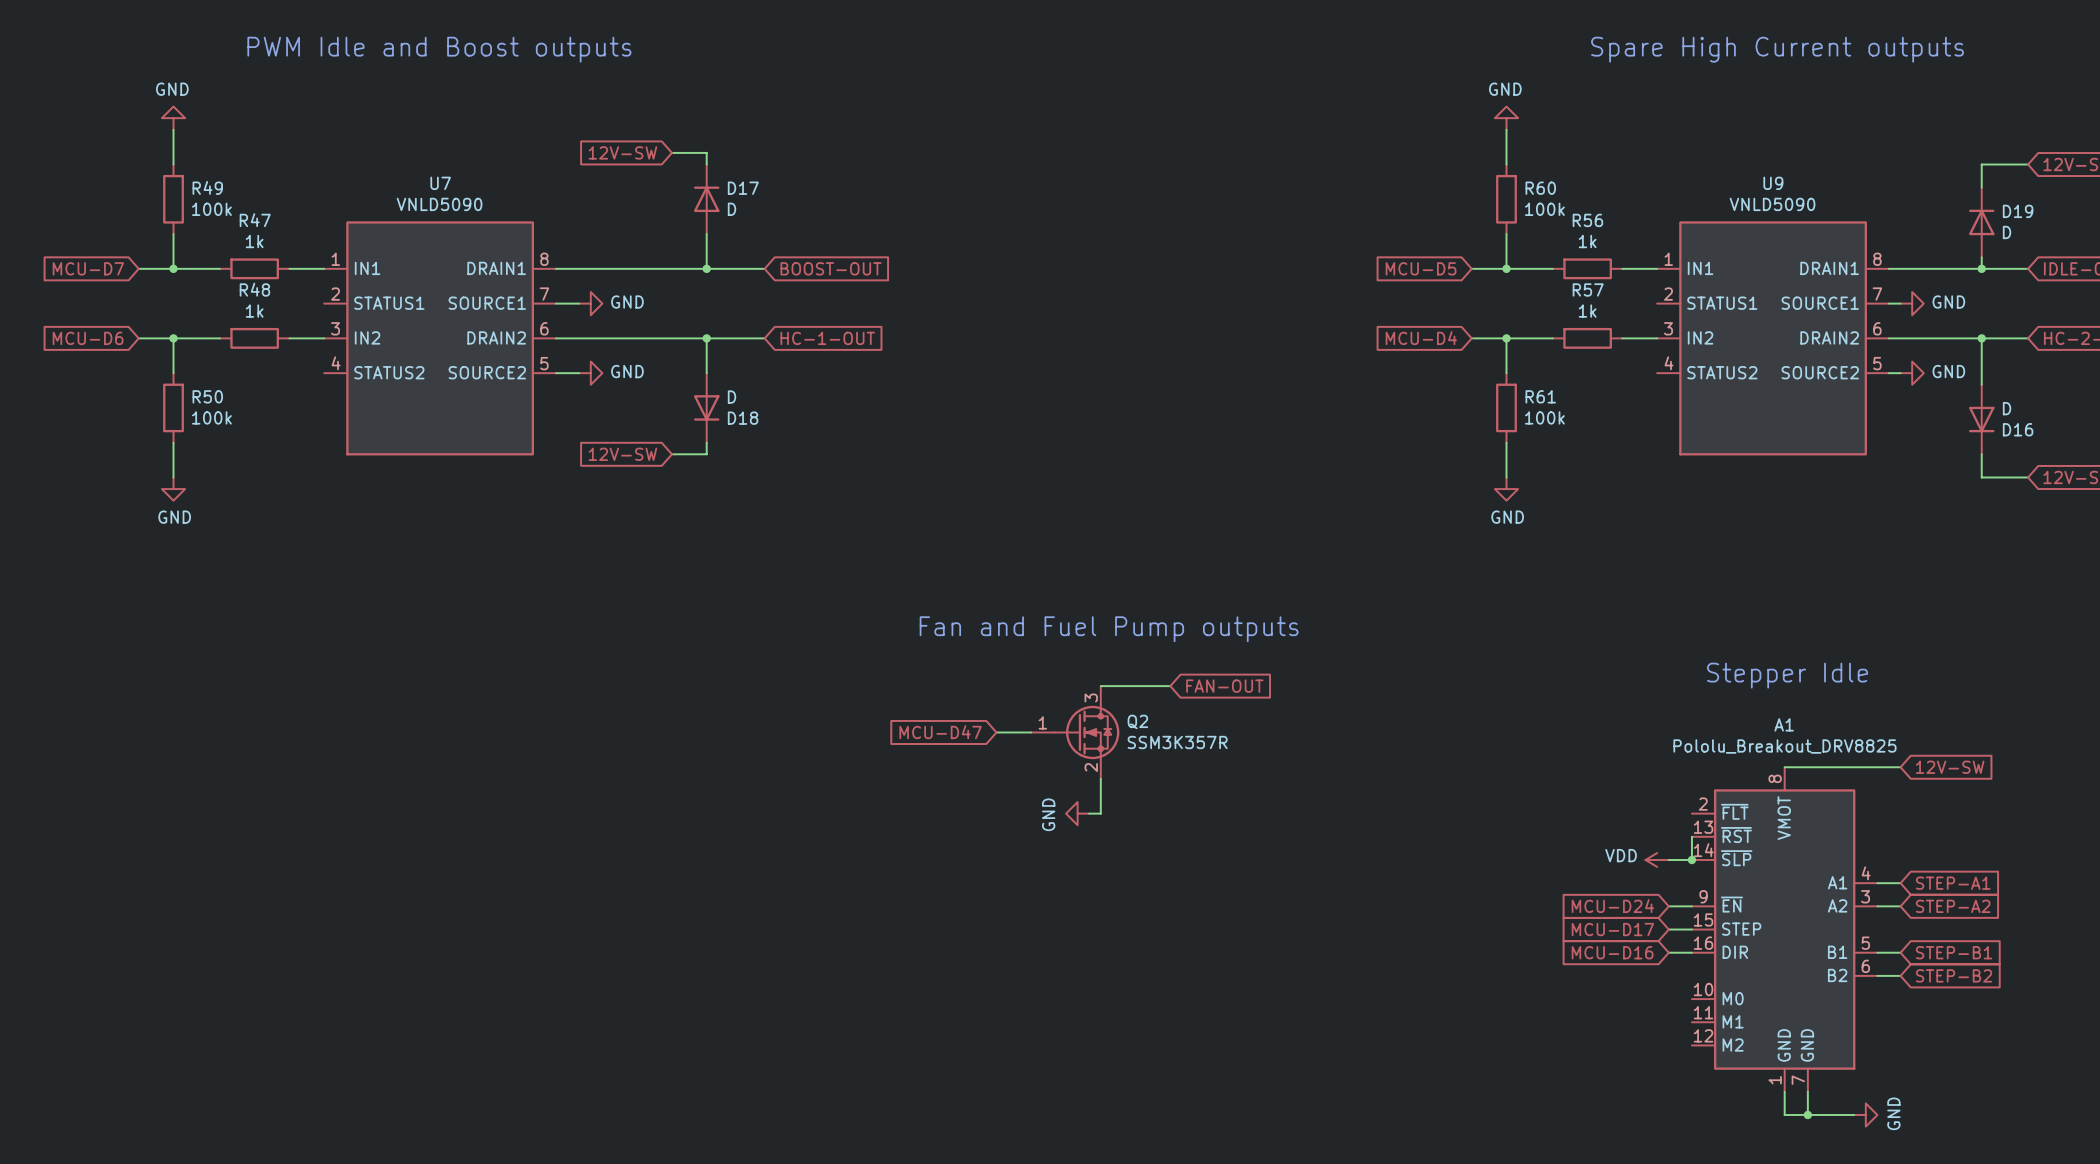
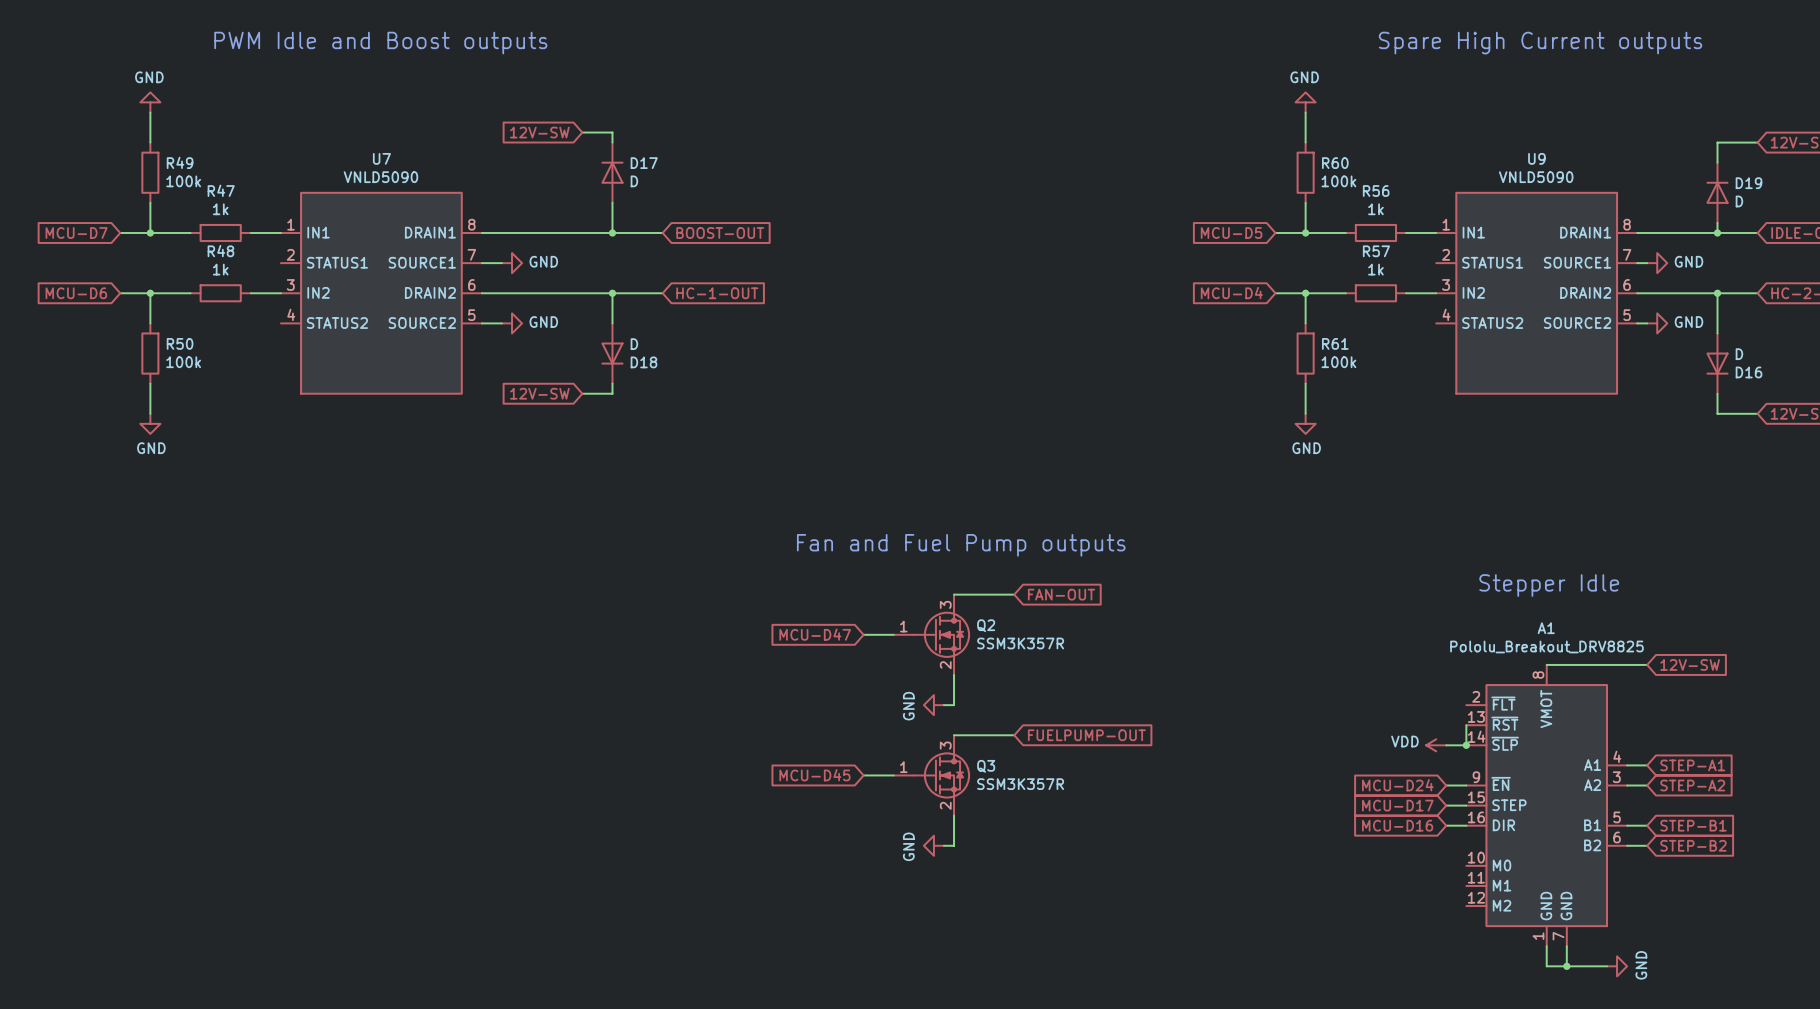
wire: none -> (954, 735) (1014, 735)
global label: none -> FUELPUMP-OUT (1086, 735)
global label: none -> MCU-D45 (814, 775)
wire: none -> (863, 775) (893, 775)
Q3: none -> SSM3K357R (931, 775)
wire: none -> (954, 815) (954, 845) (943, 845)
power symbol: none -> GND (933, 845)

